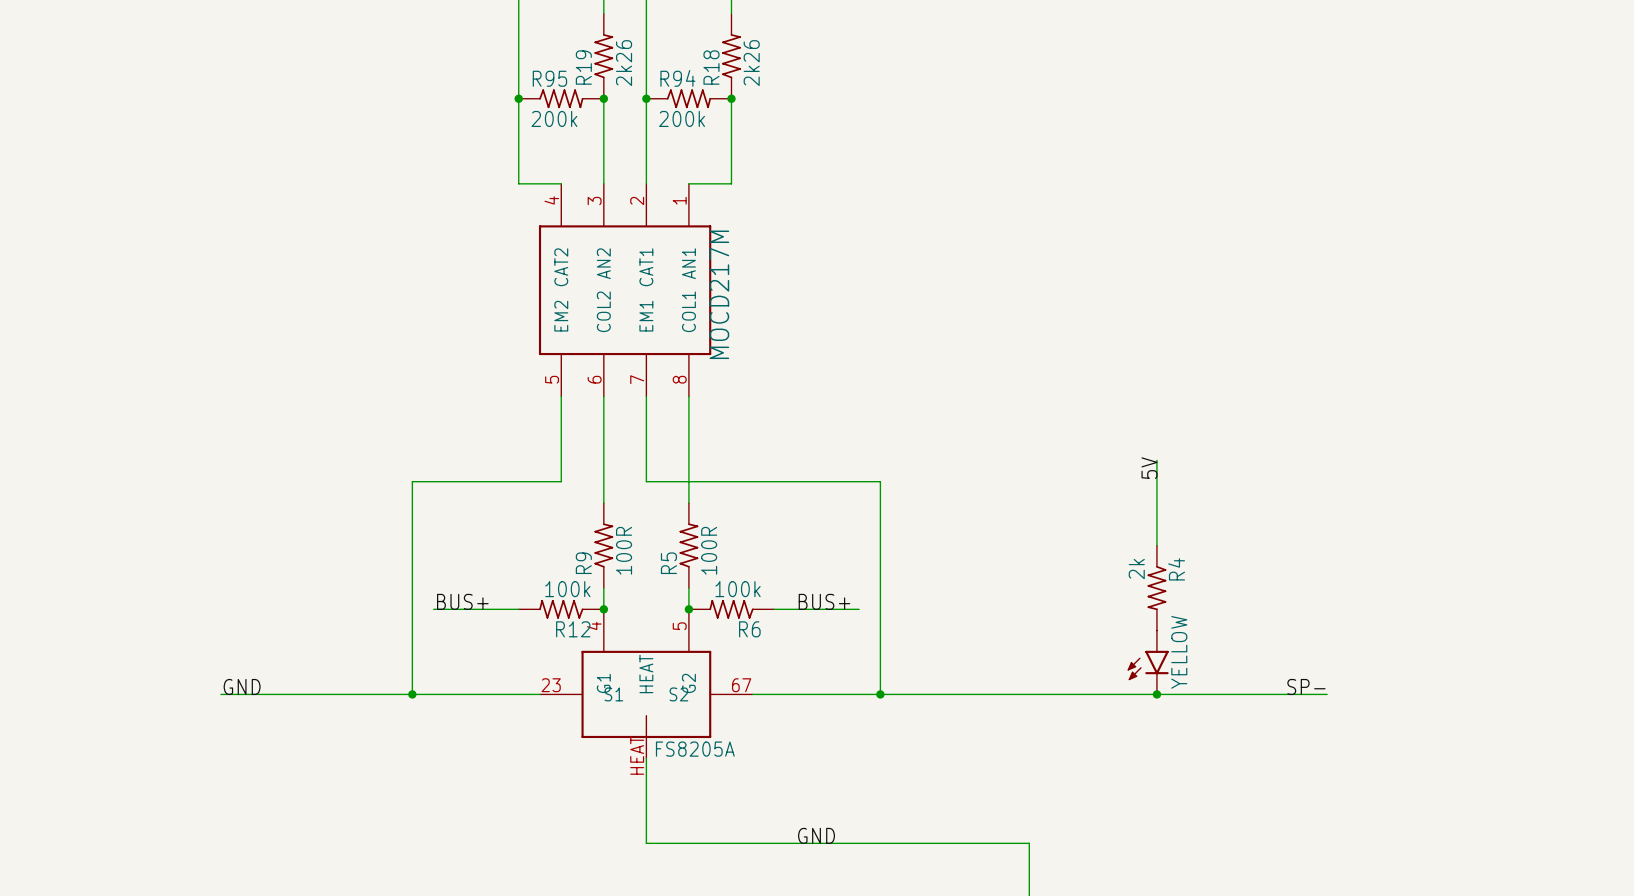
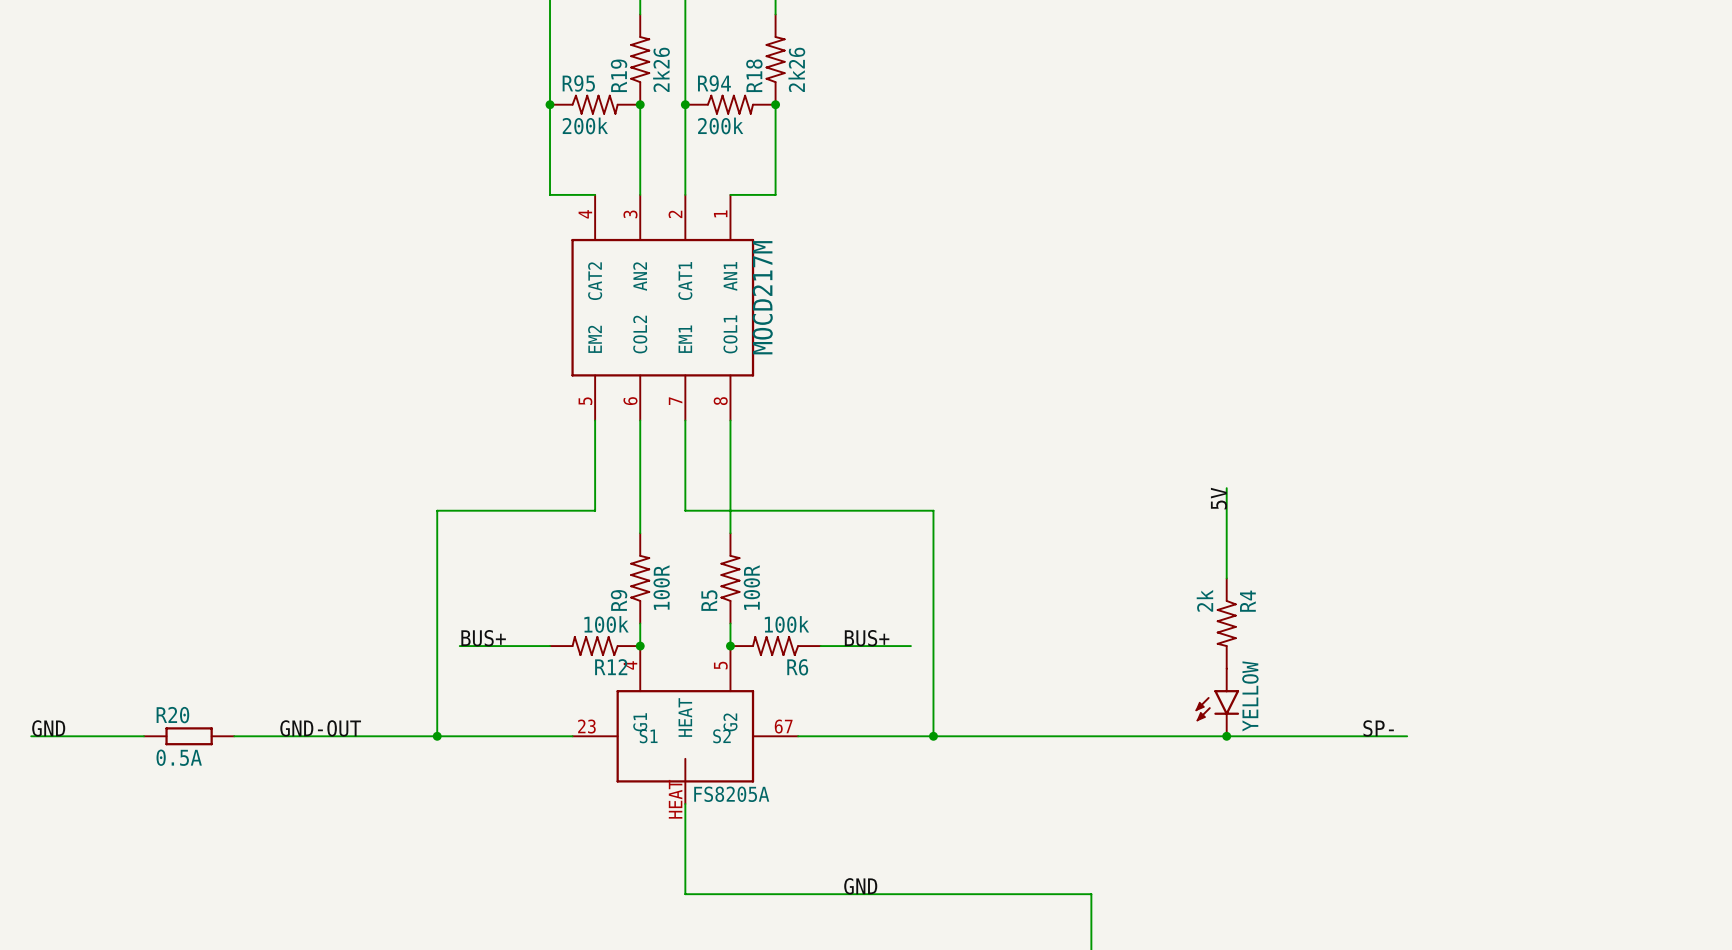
label position: GND (242, 686) -> GND (48, 728)
label: none -> GND-OUT (320, 728)
wire: none -> (31, 736) (143, 736)
R20: none -> 0.5A (189, 736)

